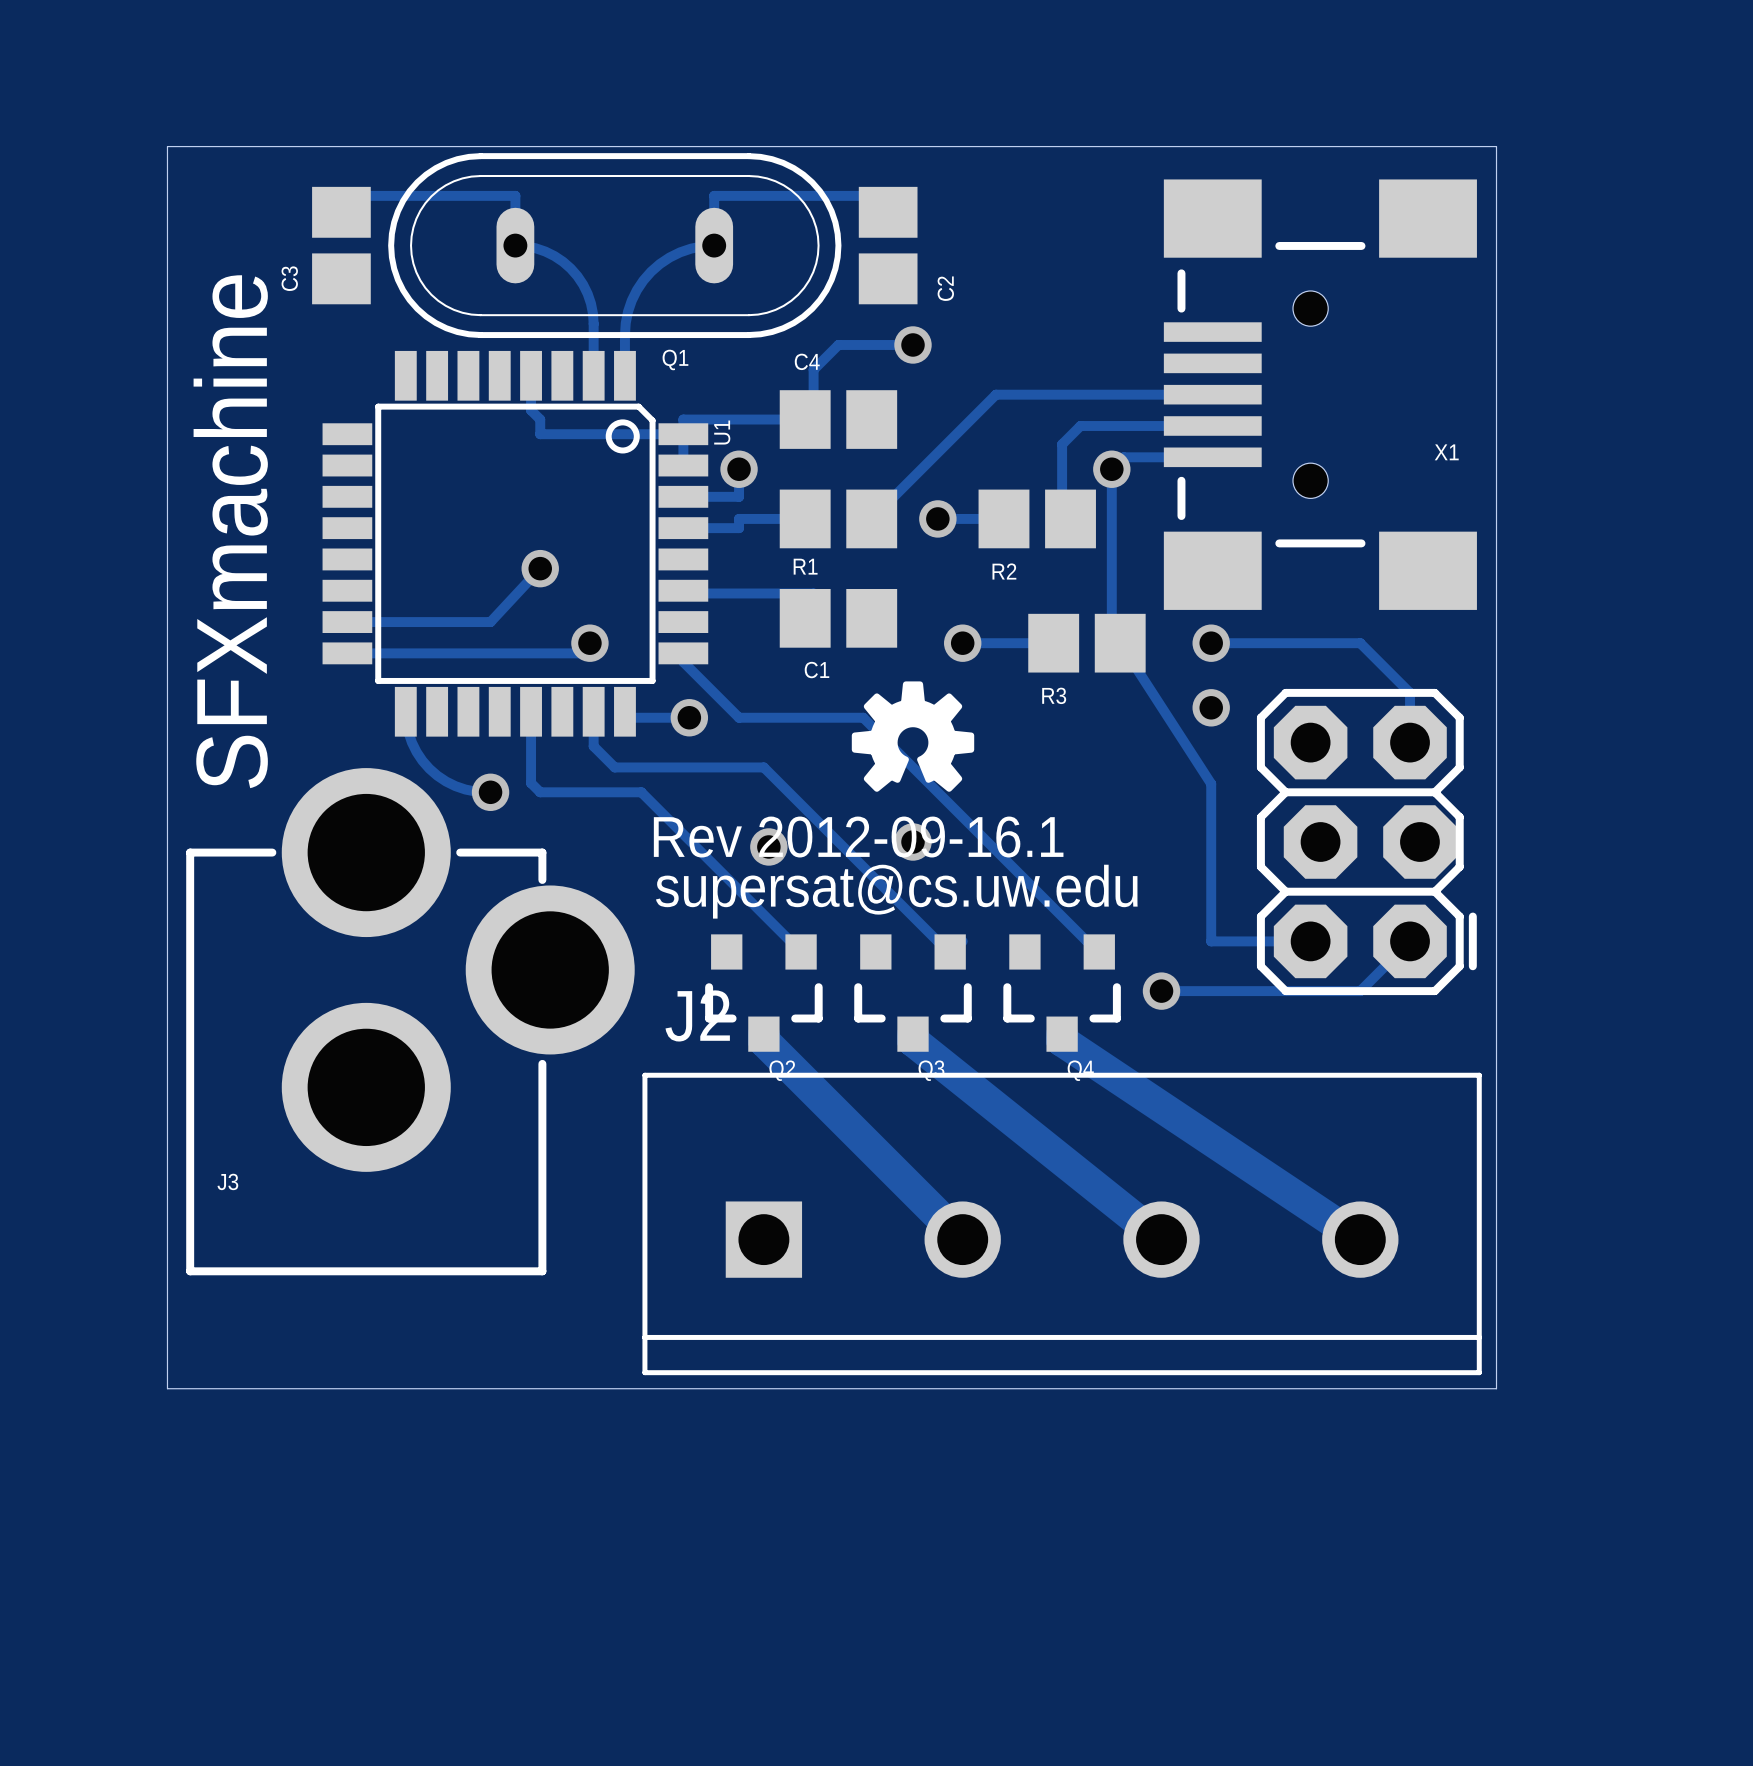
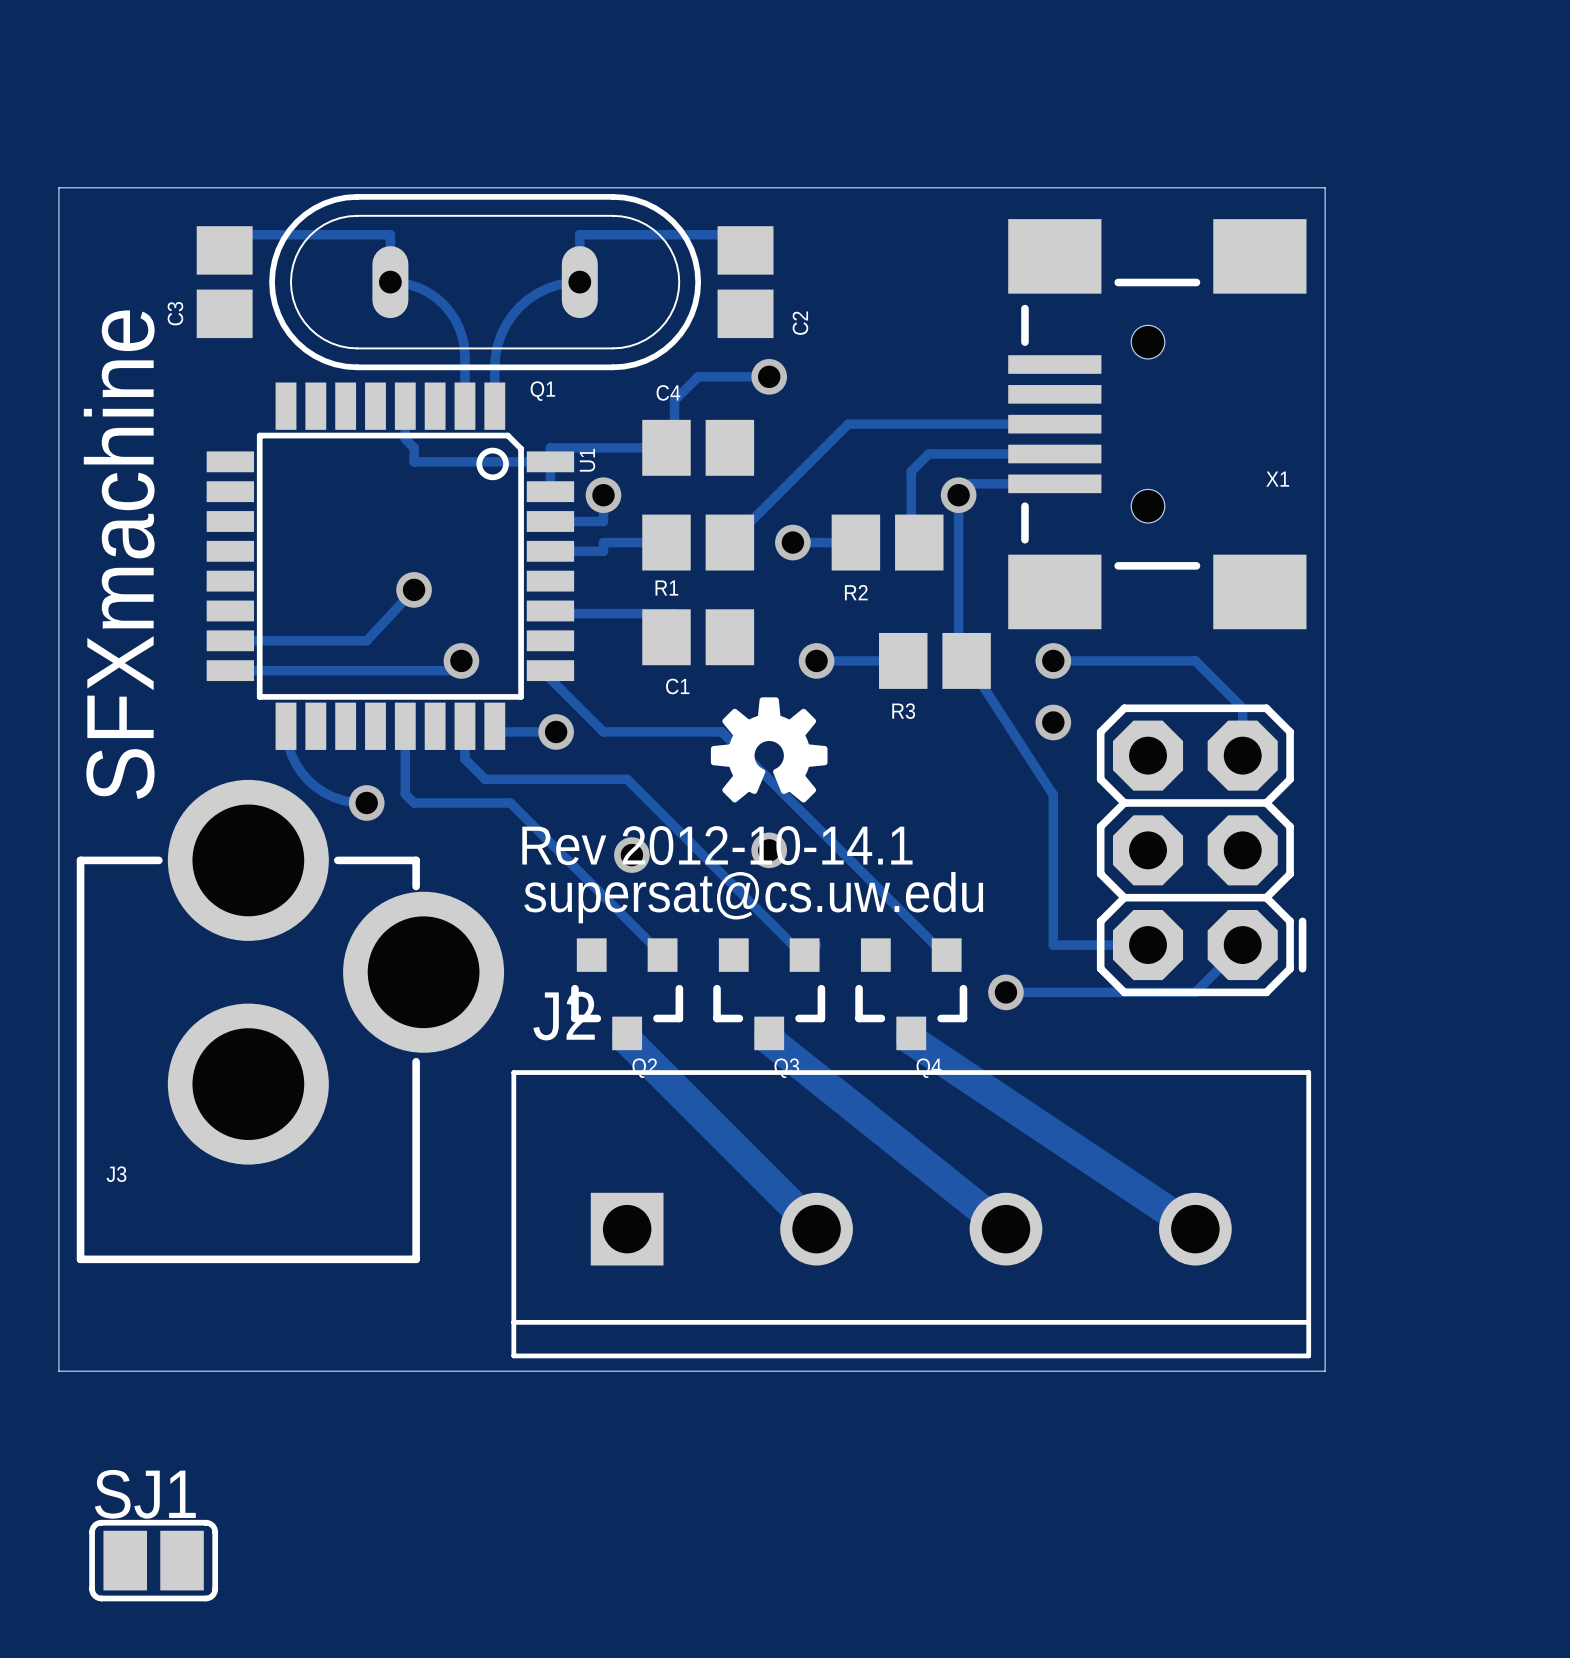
part footprint: [1256, 688, 1477, 996] -> [1096, 704, 1307, 997]
text: Rev 2012-09-16.1 (858, 837) -> Rev 2012-10-14.1 (717, 845)
SJ1: none -> (153, 1560)

